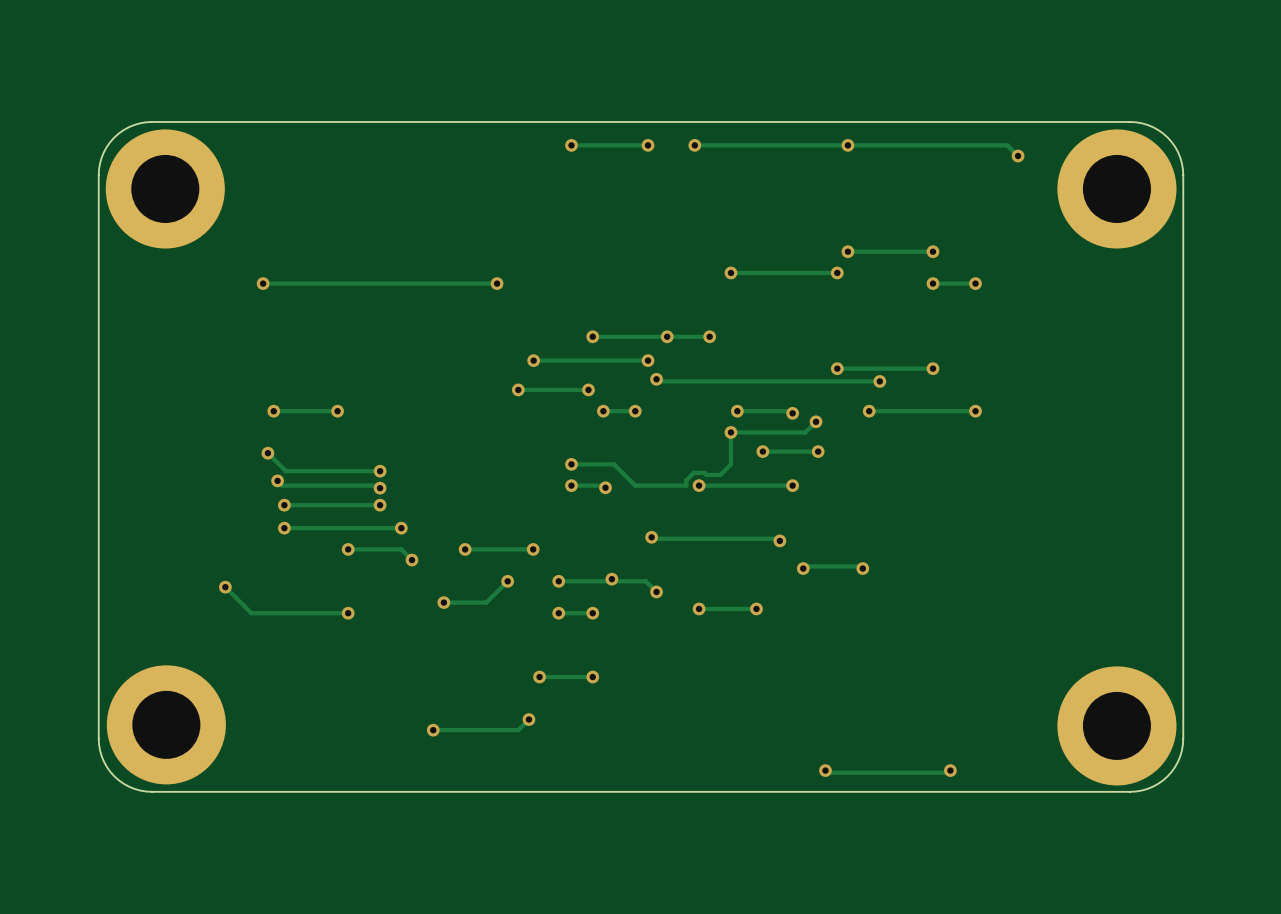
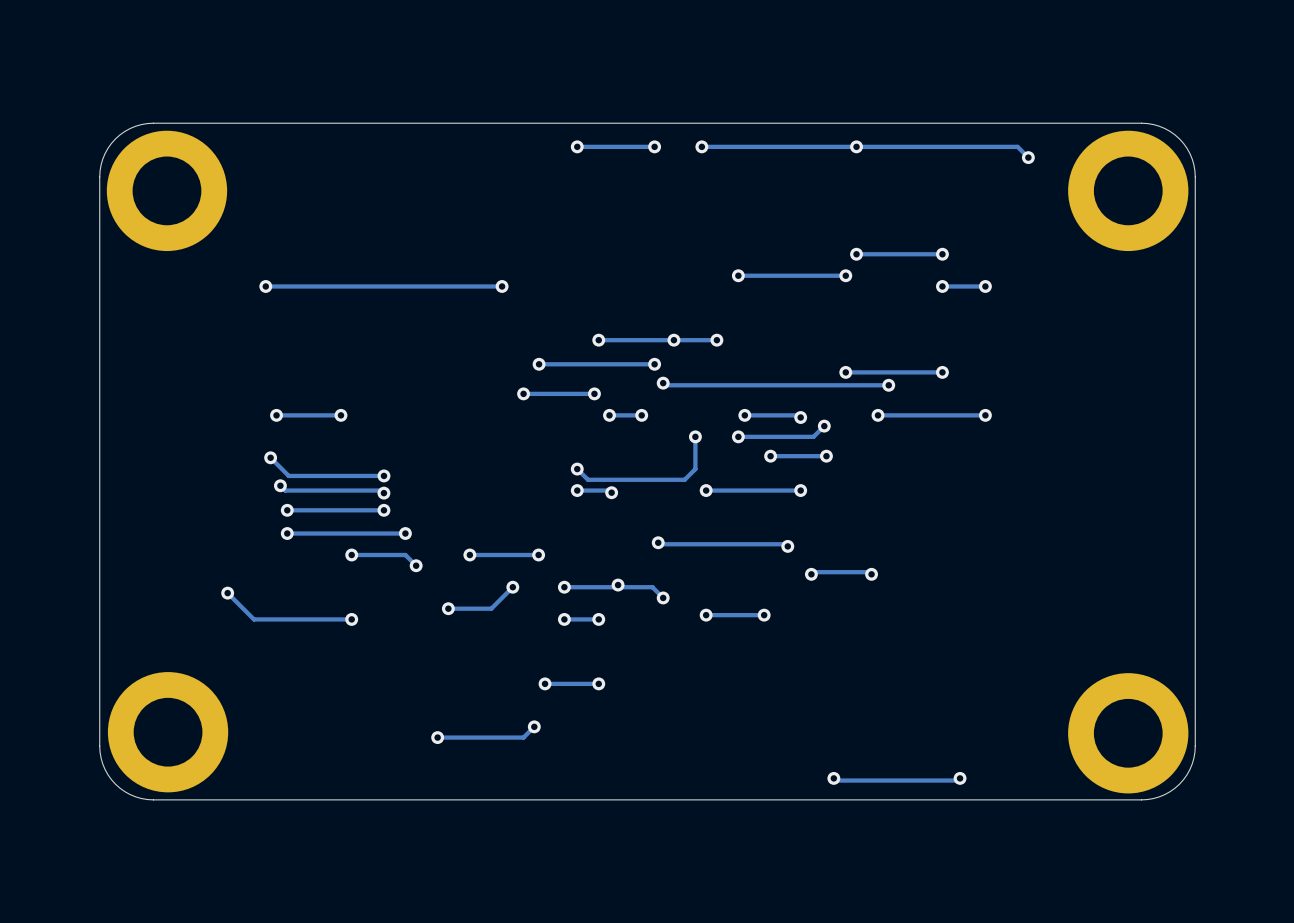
via: none -> (695, 436)
track: (730, 432) (730, 464) (720, 474) (693, 472) (686, 480) (686, 485) (635, 485) (614, 464) (571, 464) -> (695, 436) (695, 469) (684, 479) (588, 479) (577, 469)

